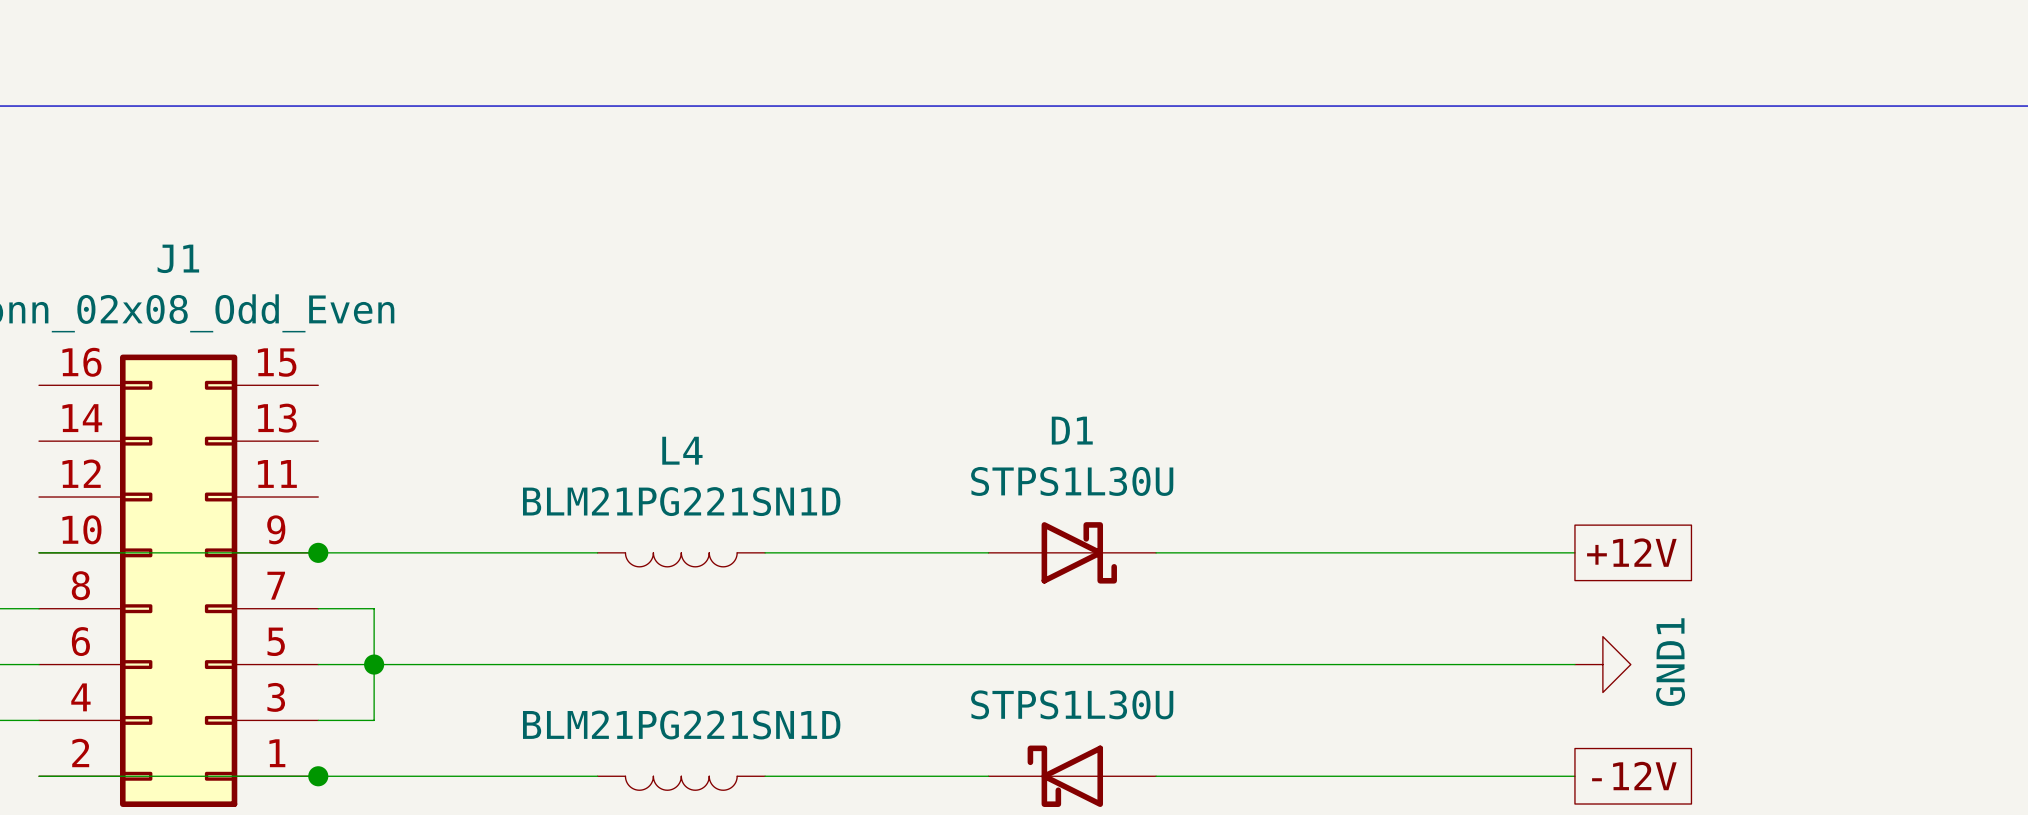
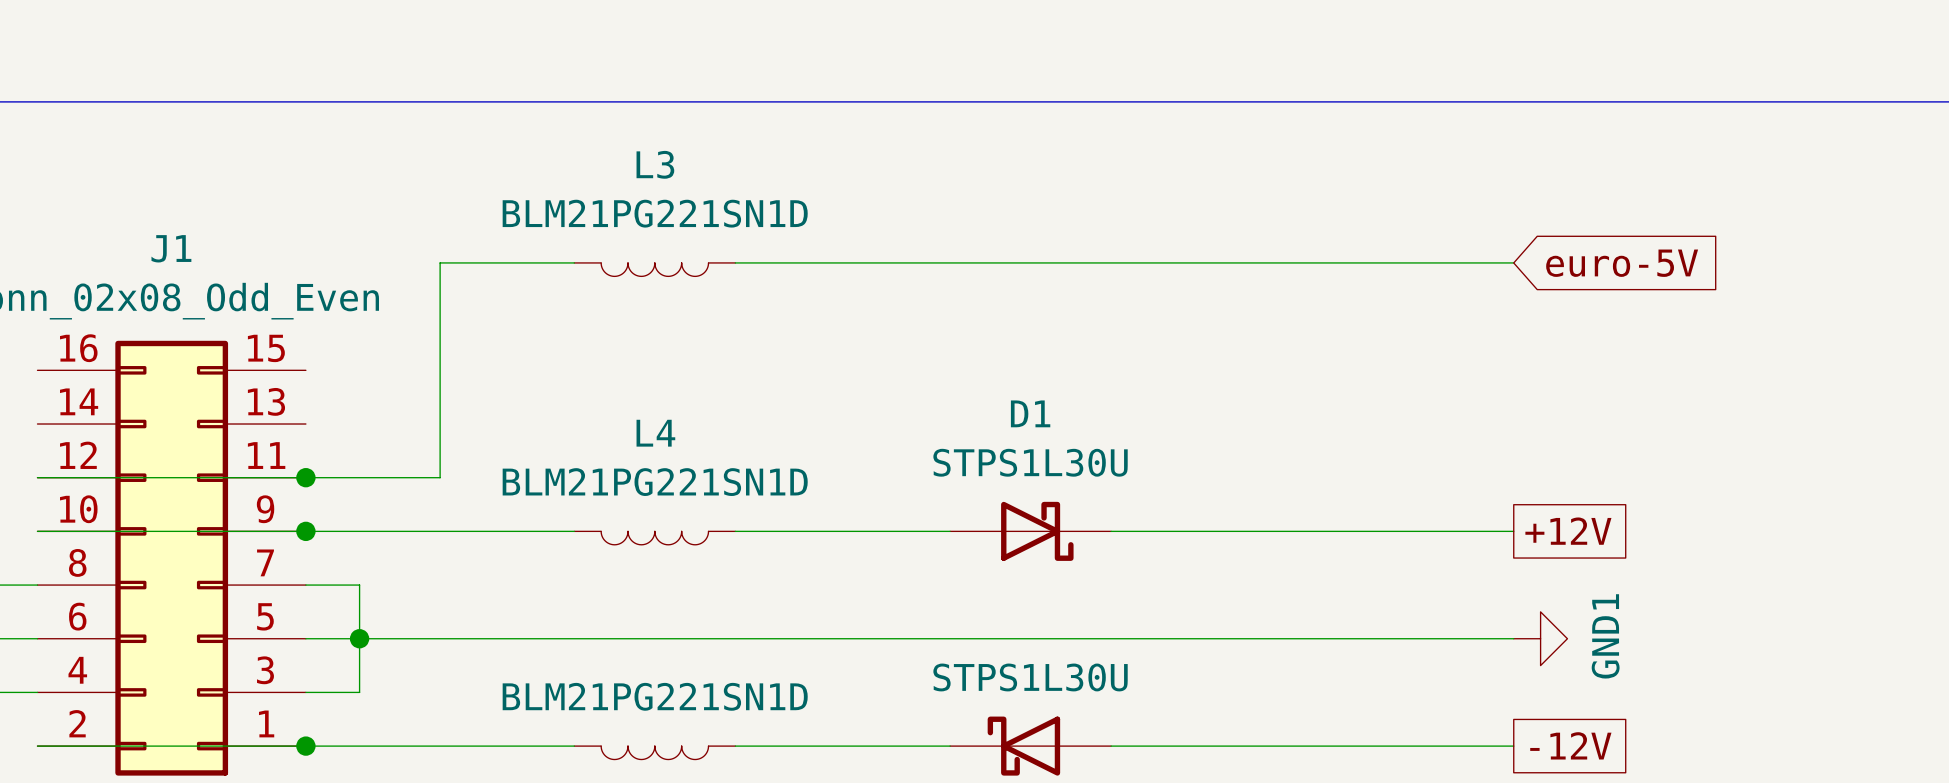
wire: none -> (574, 262) (440, 262) (440, 477) (37, 477)
wire: none -> (735, 262) (1513, 262)
global label: none -> euro-5V (1622, 263)
L3: none -> BLM21PG221SN1D (654, 269)
junction: none -> (305, 477)

